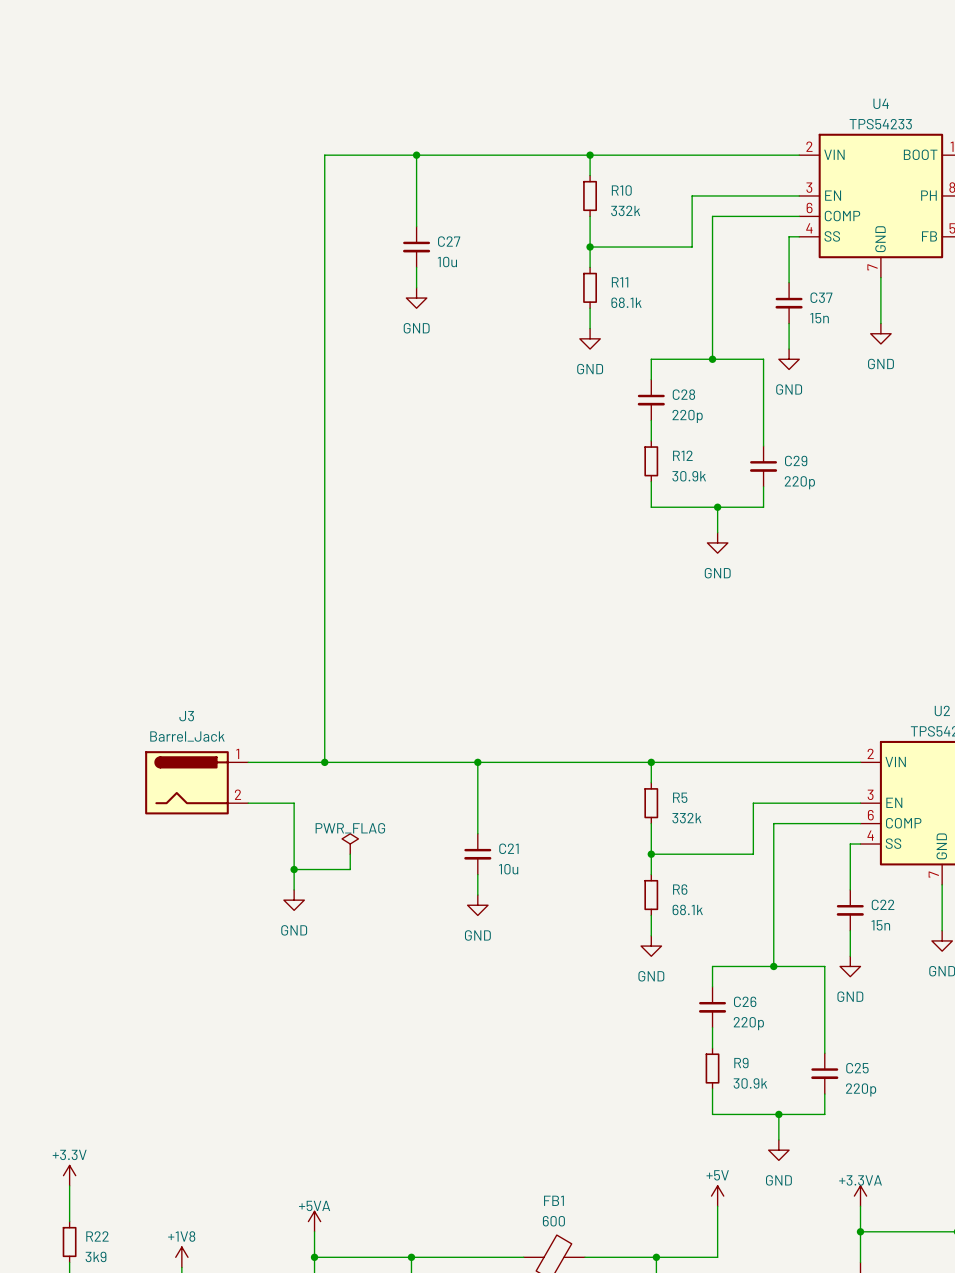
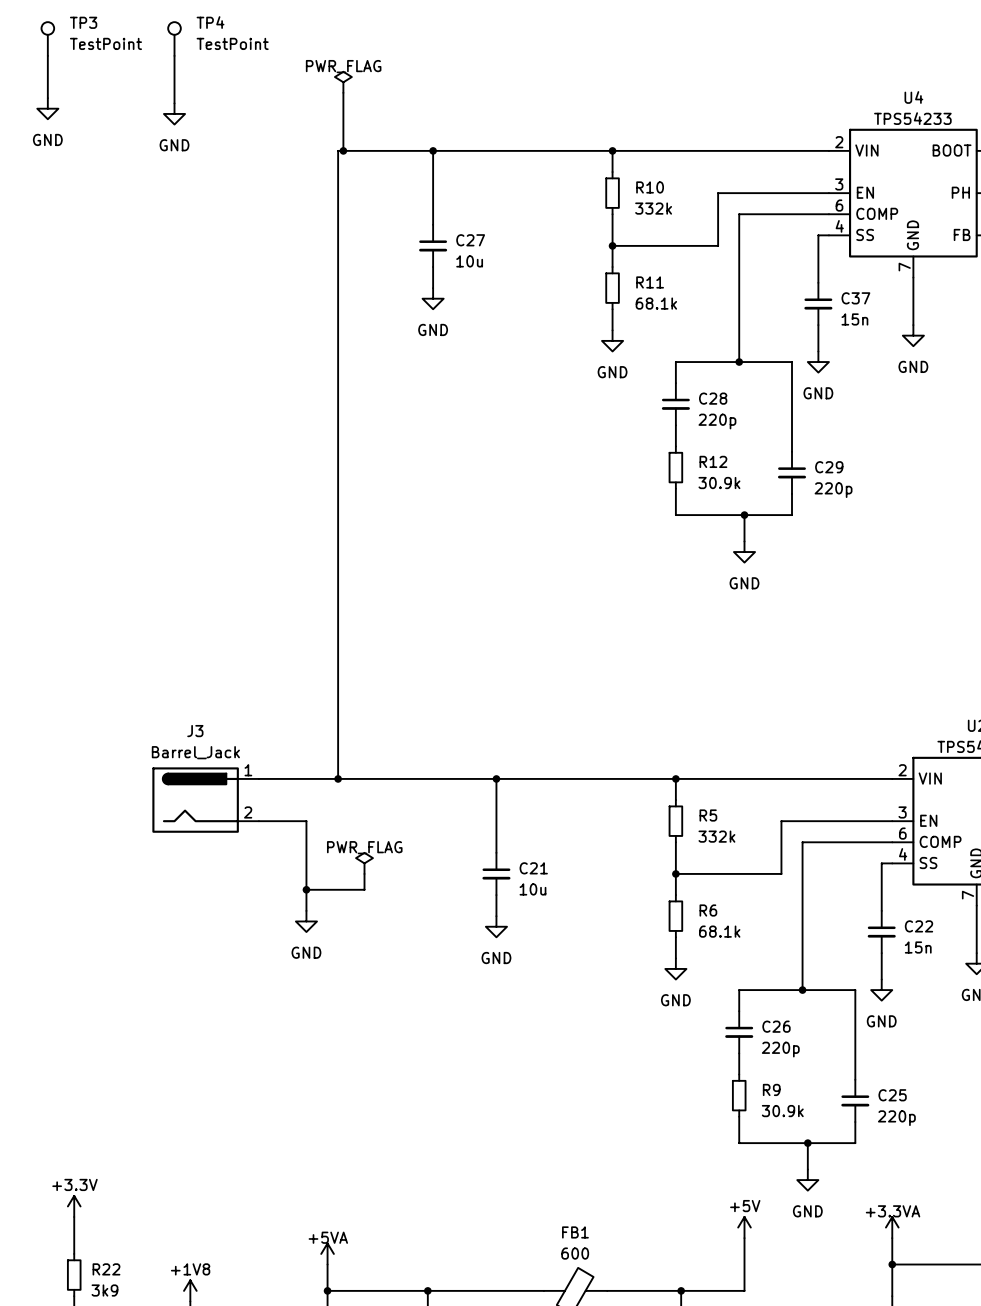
TP3: none -> TestPoint (47, 39)
TP4: none -> TestPoint (174, 39)
wire: none -> (47, 55) (47, 98)
wire: none -> (174, 55) (174, 103)
power symbol: none -> PWR_FLAG (343, 82)
wire: none -> (343, 92) (343, 150)
power symbol: none -> GND (47, 108)
power symbol: none -> GND (174, 113)
junction: none -> (343, 150)

